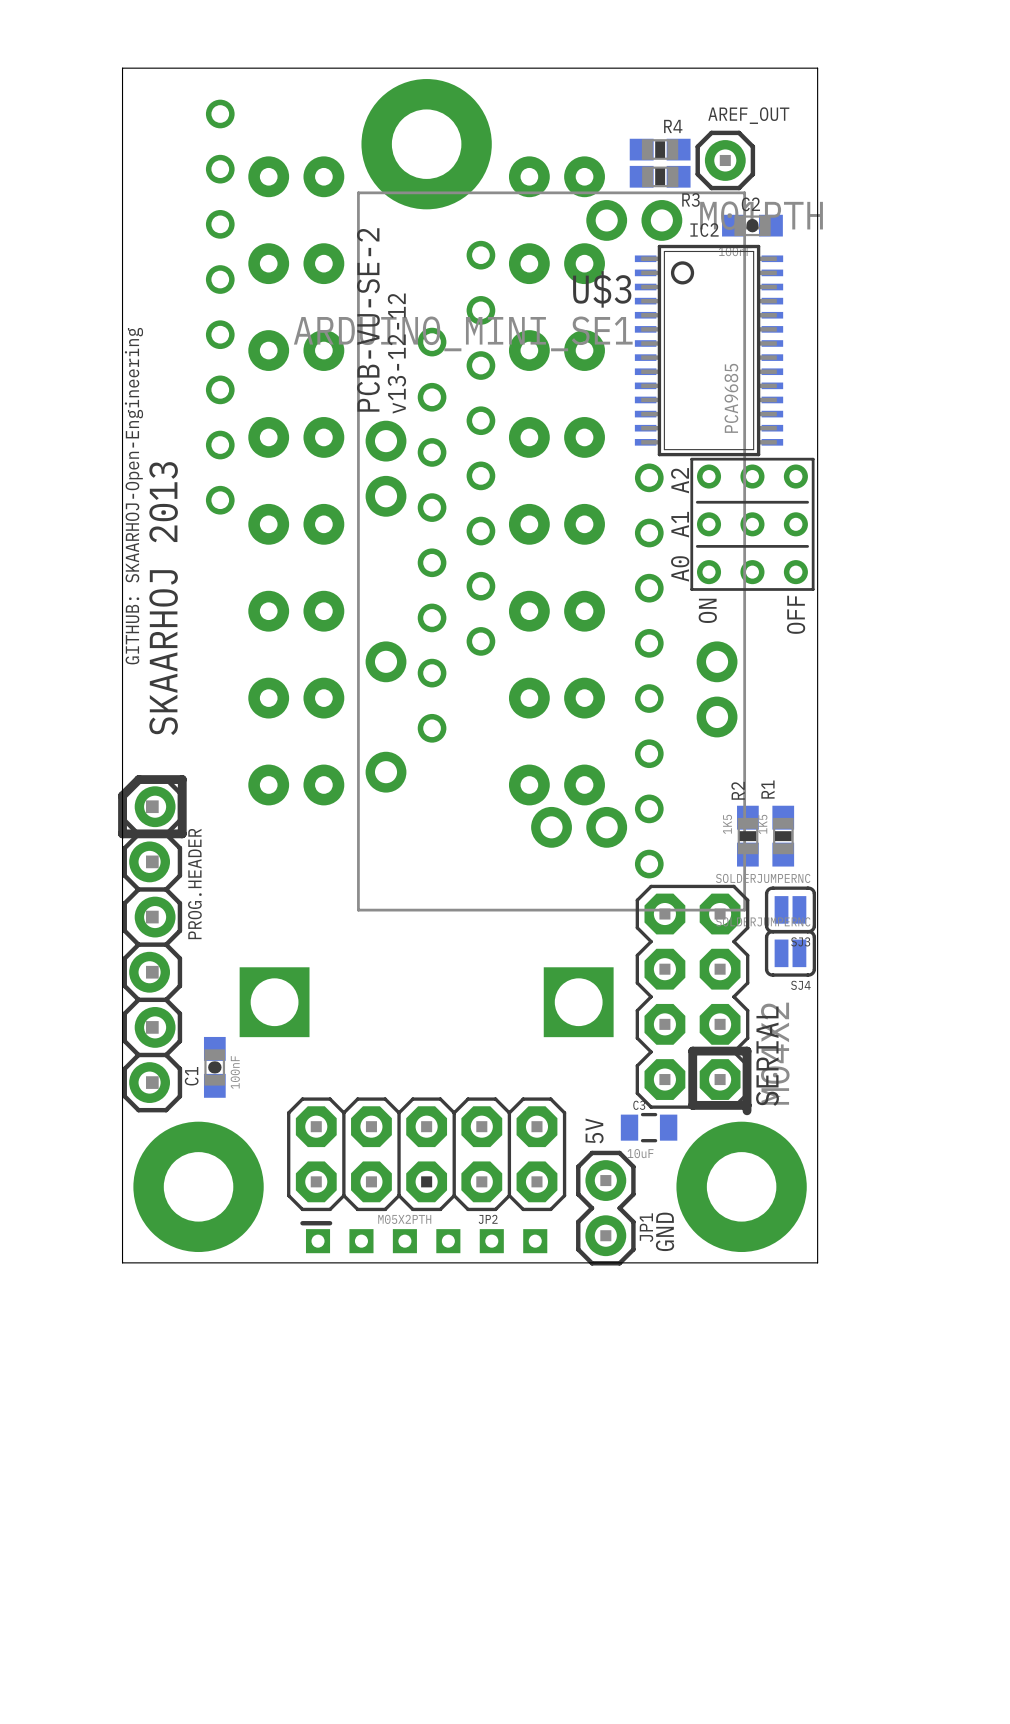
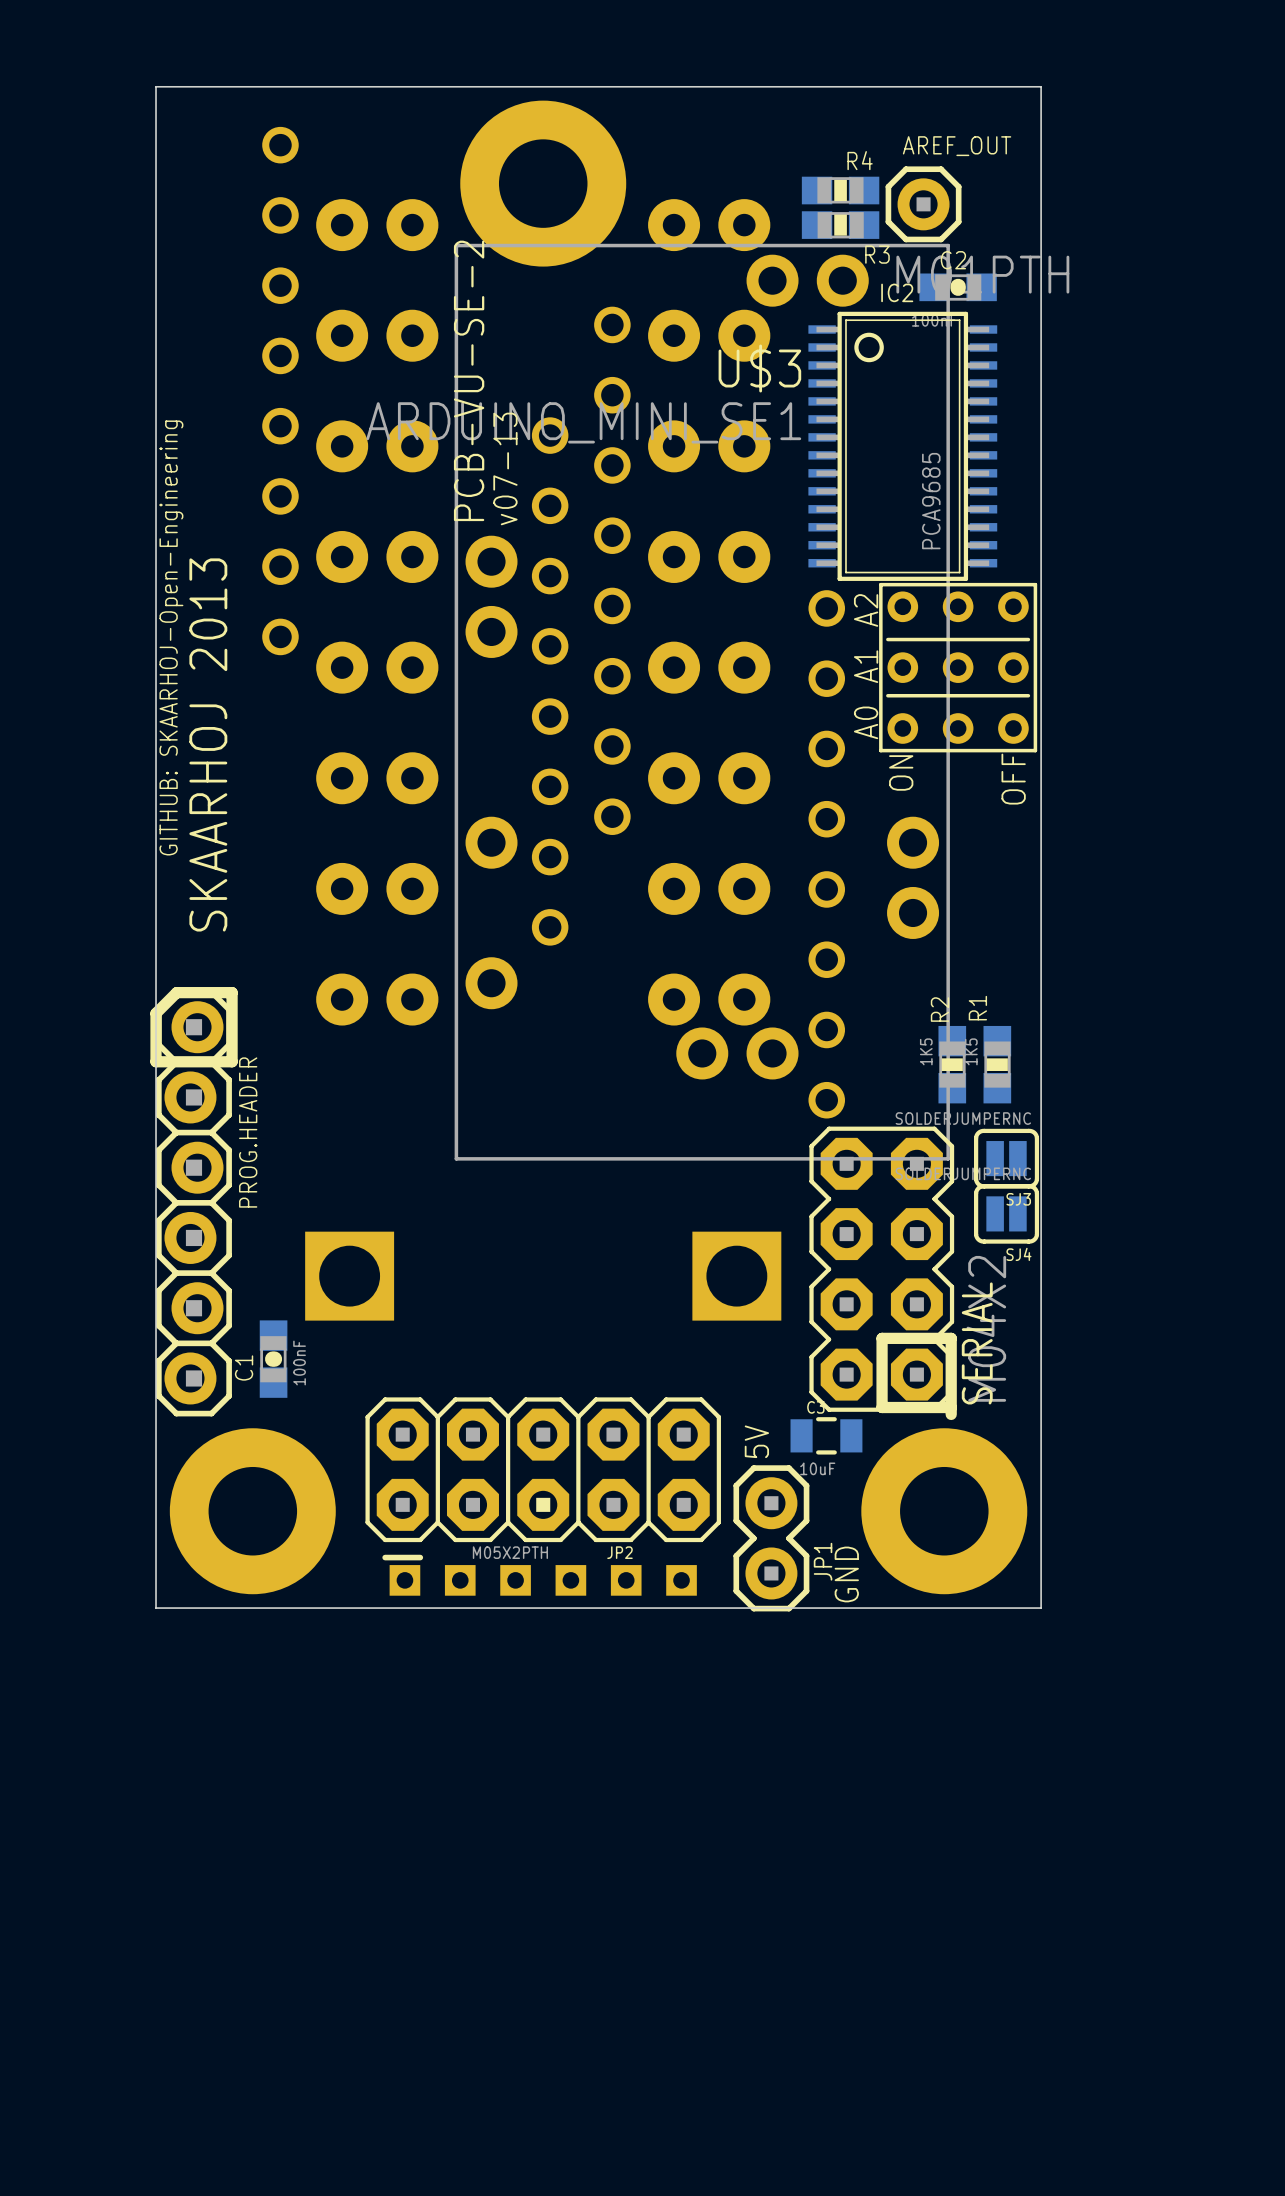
text: v13-12-12 (396, 353) -> v07-13 (505, 468)

